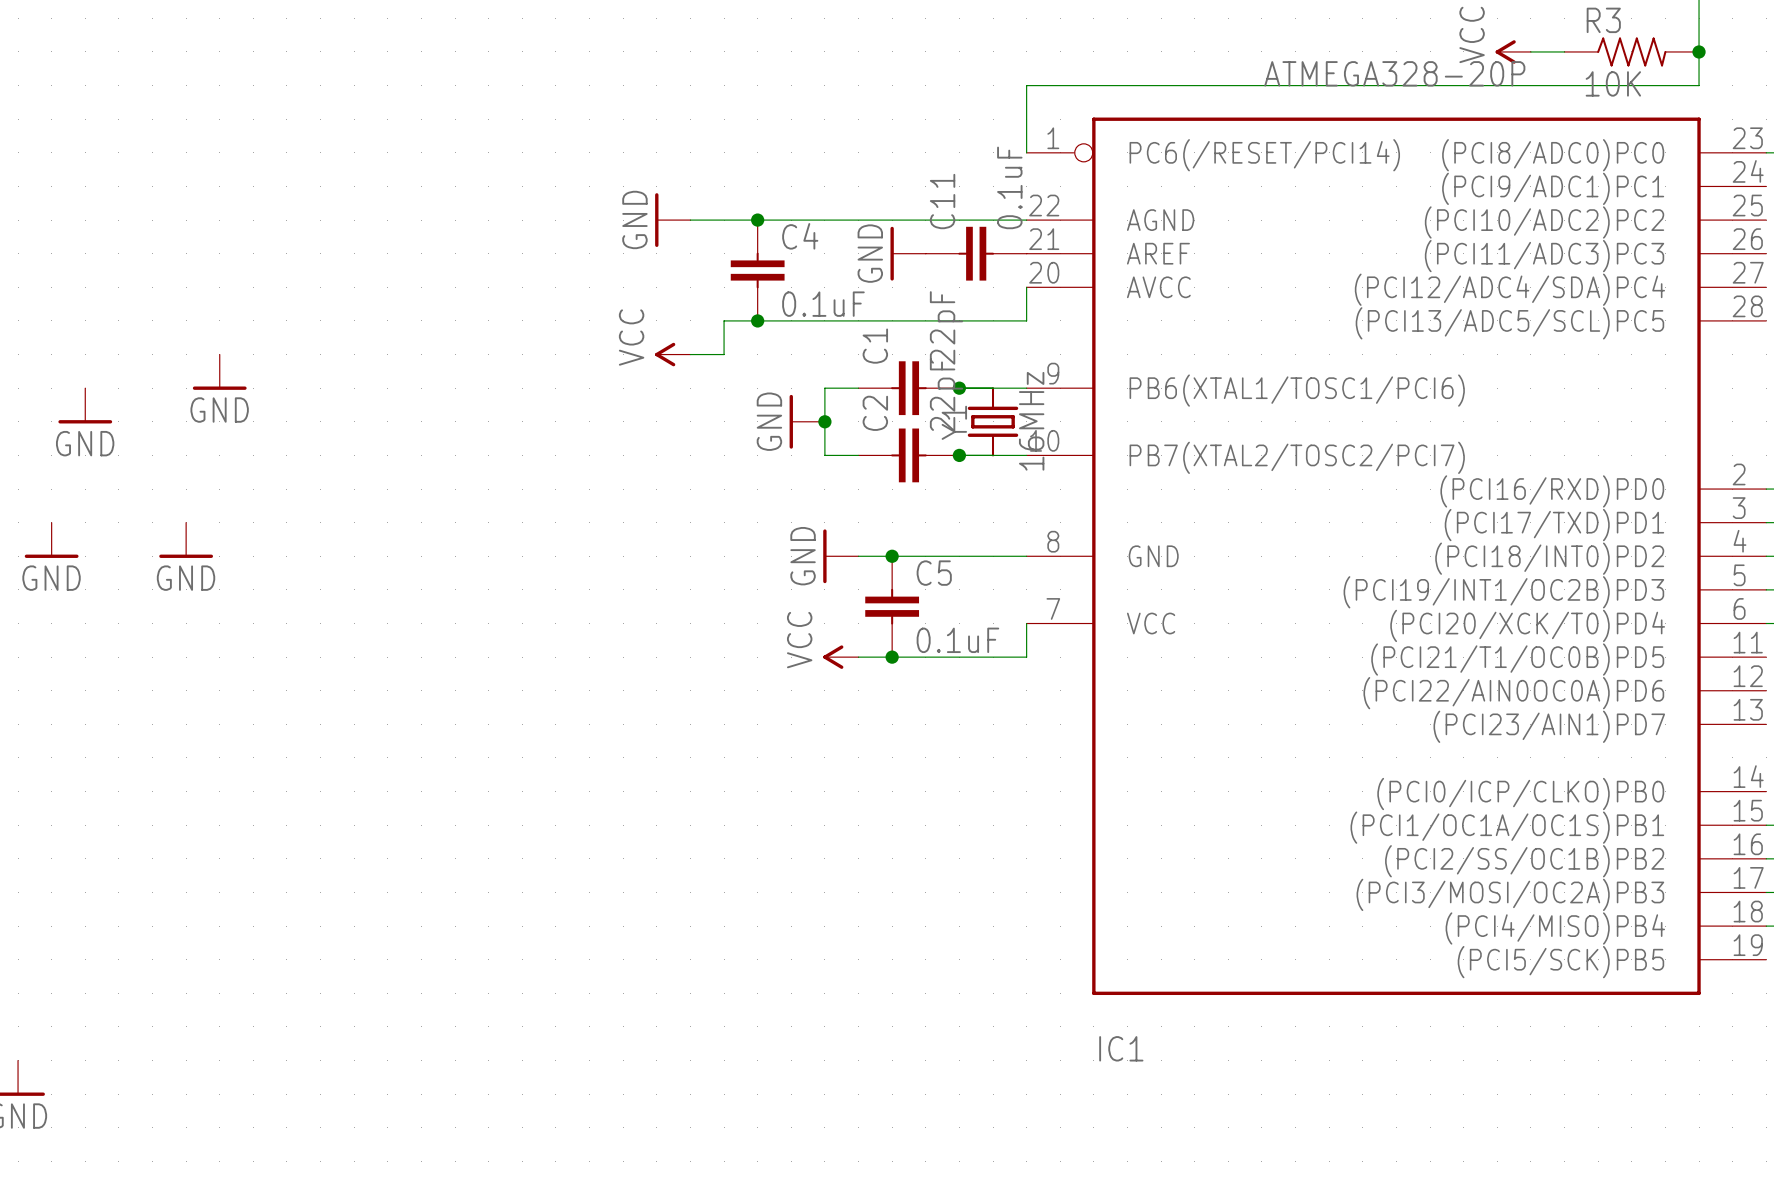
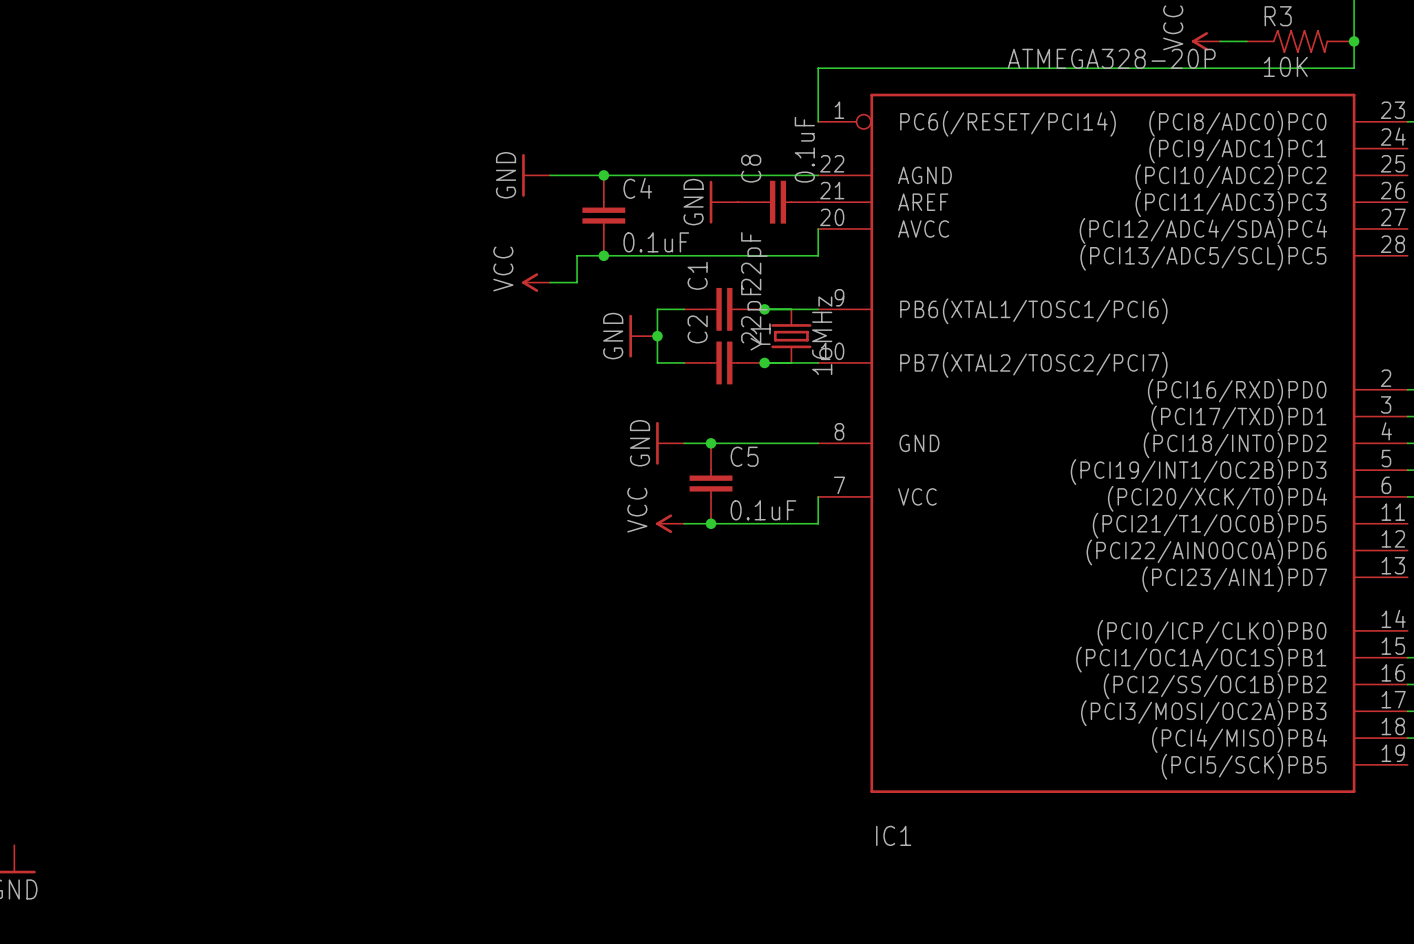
C11 name: C11 (942, 201) -> C8 (751, 168)
power symbol: GND (219, 372) -> none
power symbol: GND (85, 405) -> none
power symbol: GND (51, 540) -> none
power symbol: GND (186, 540) -> none

